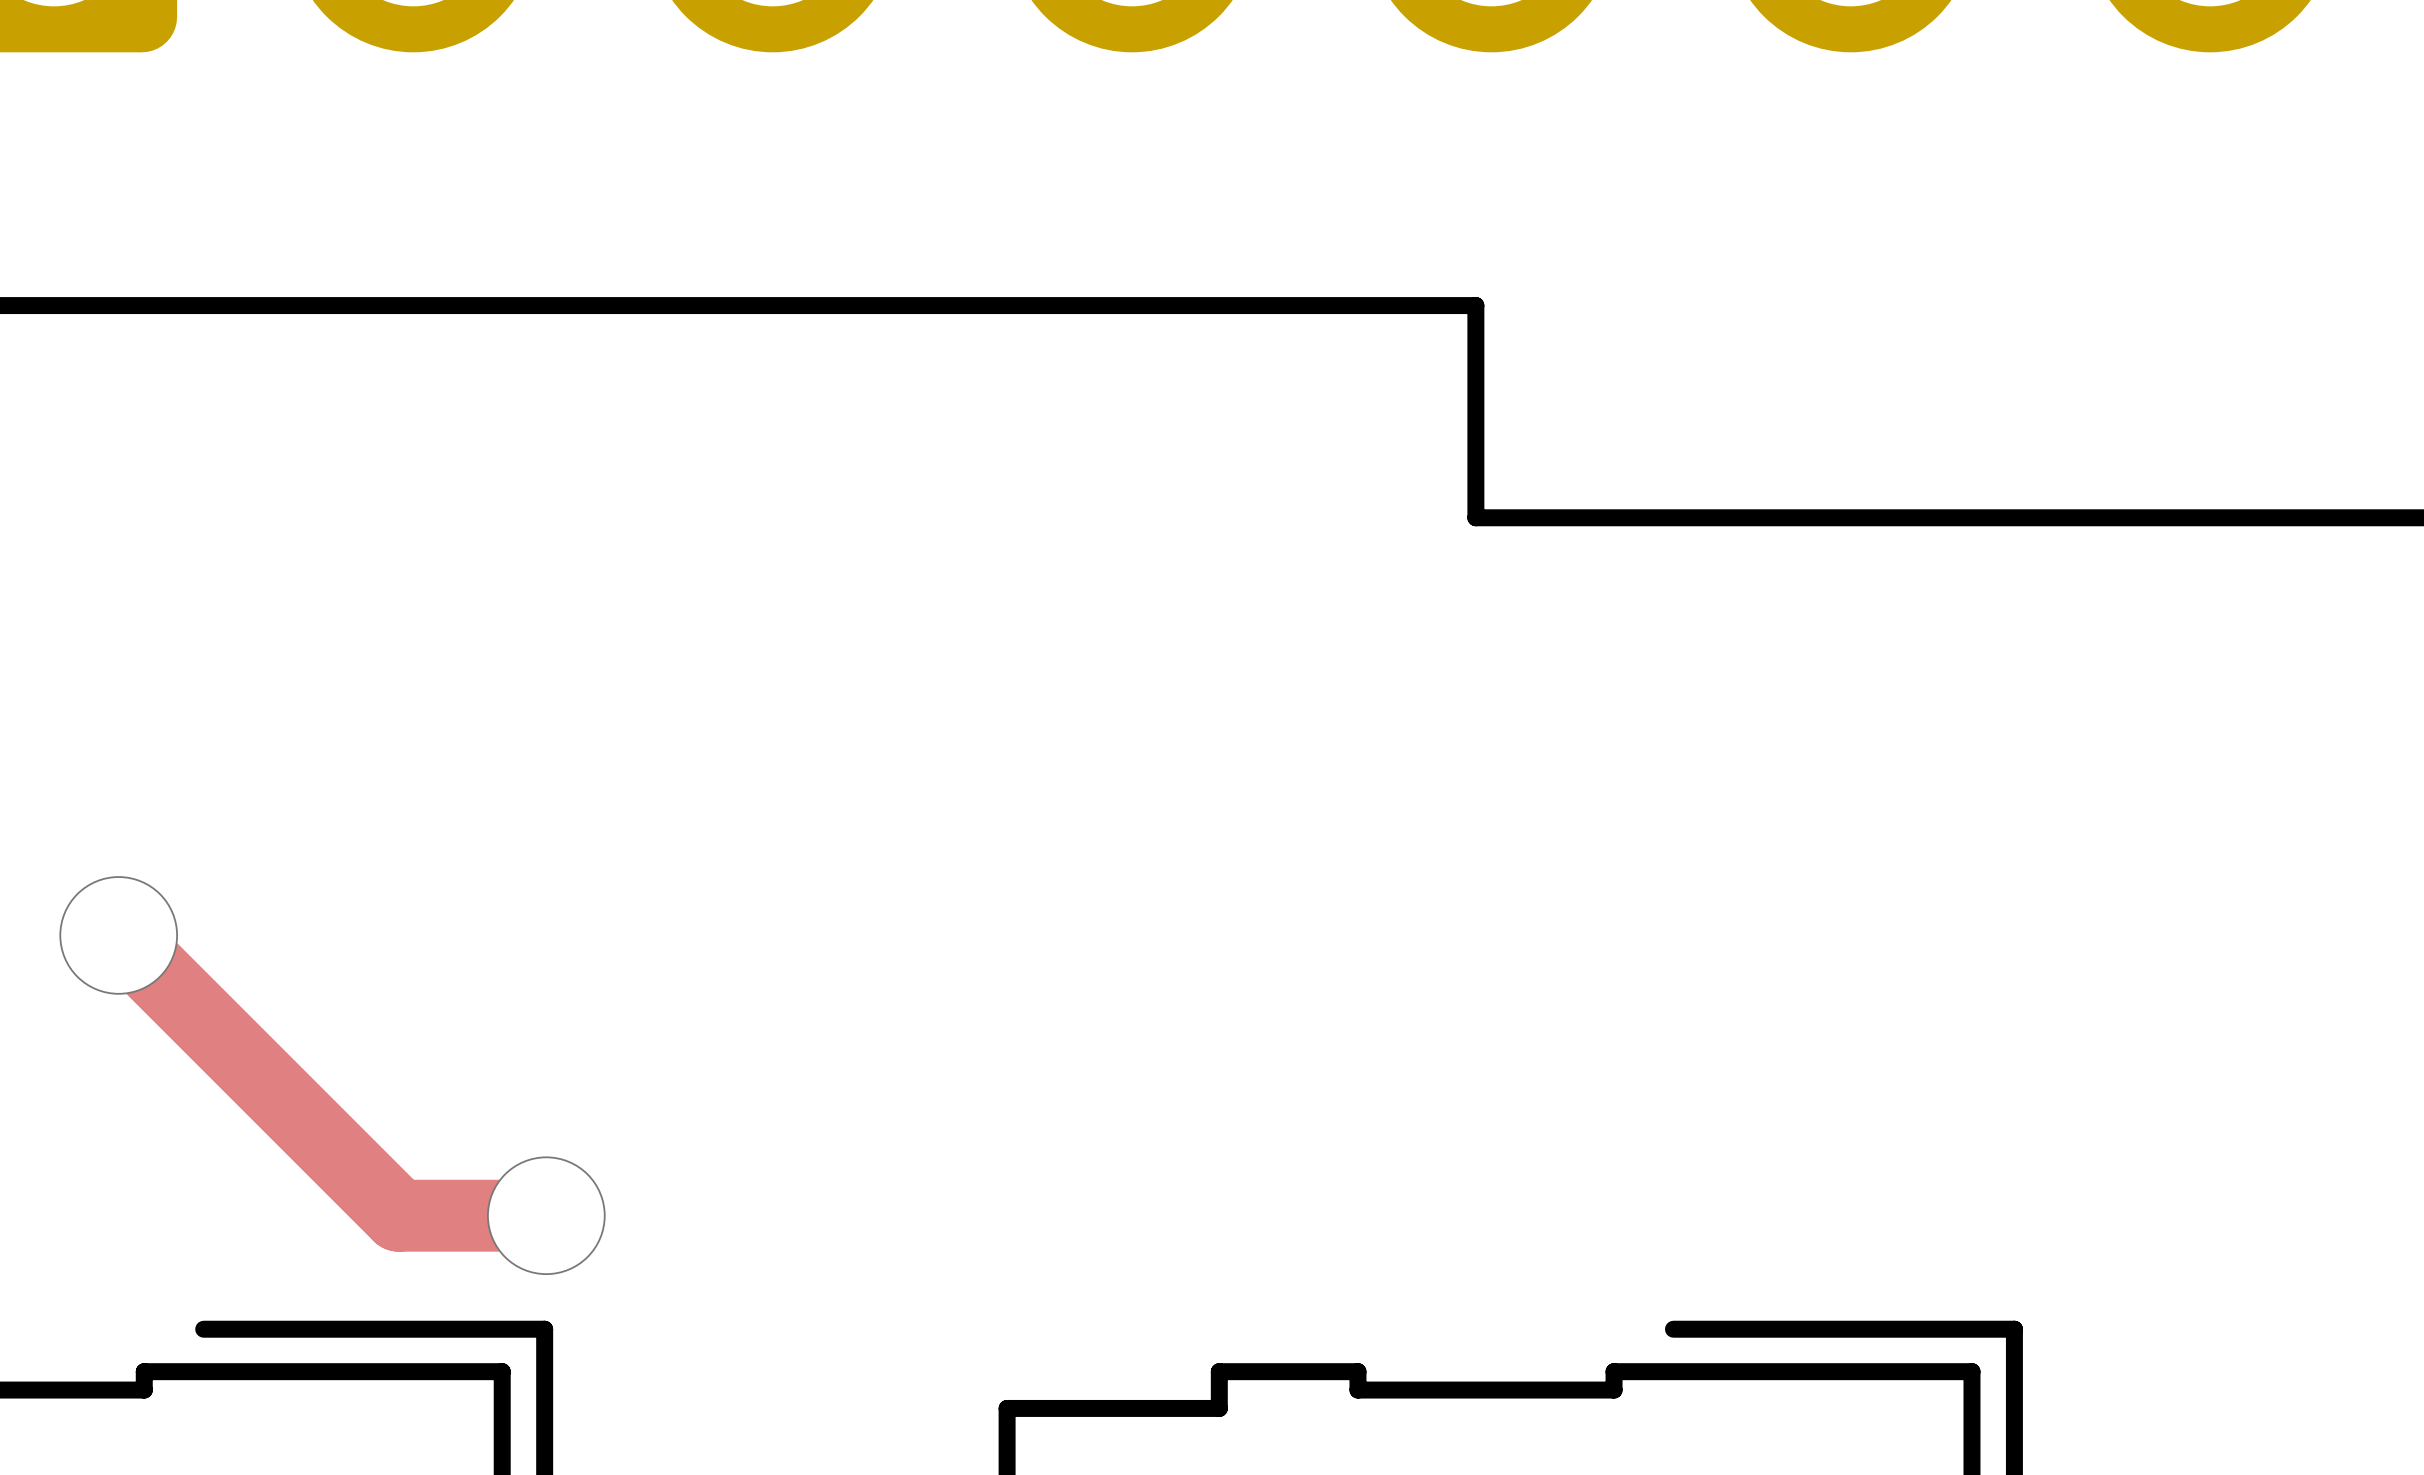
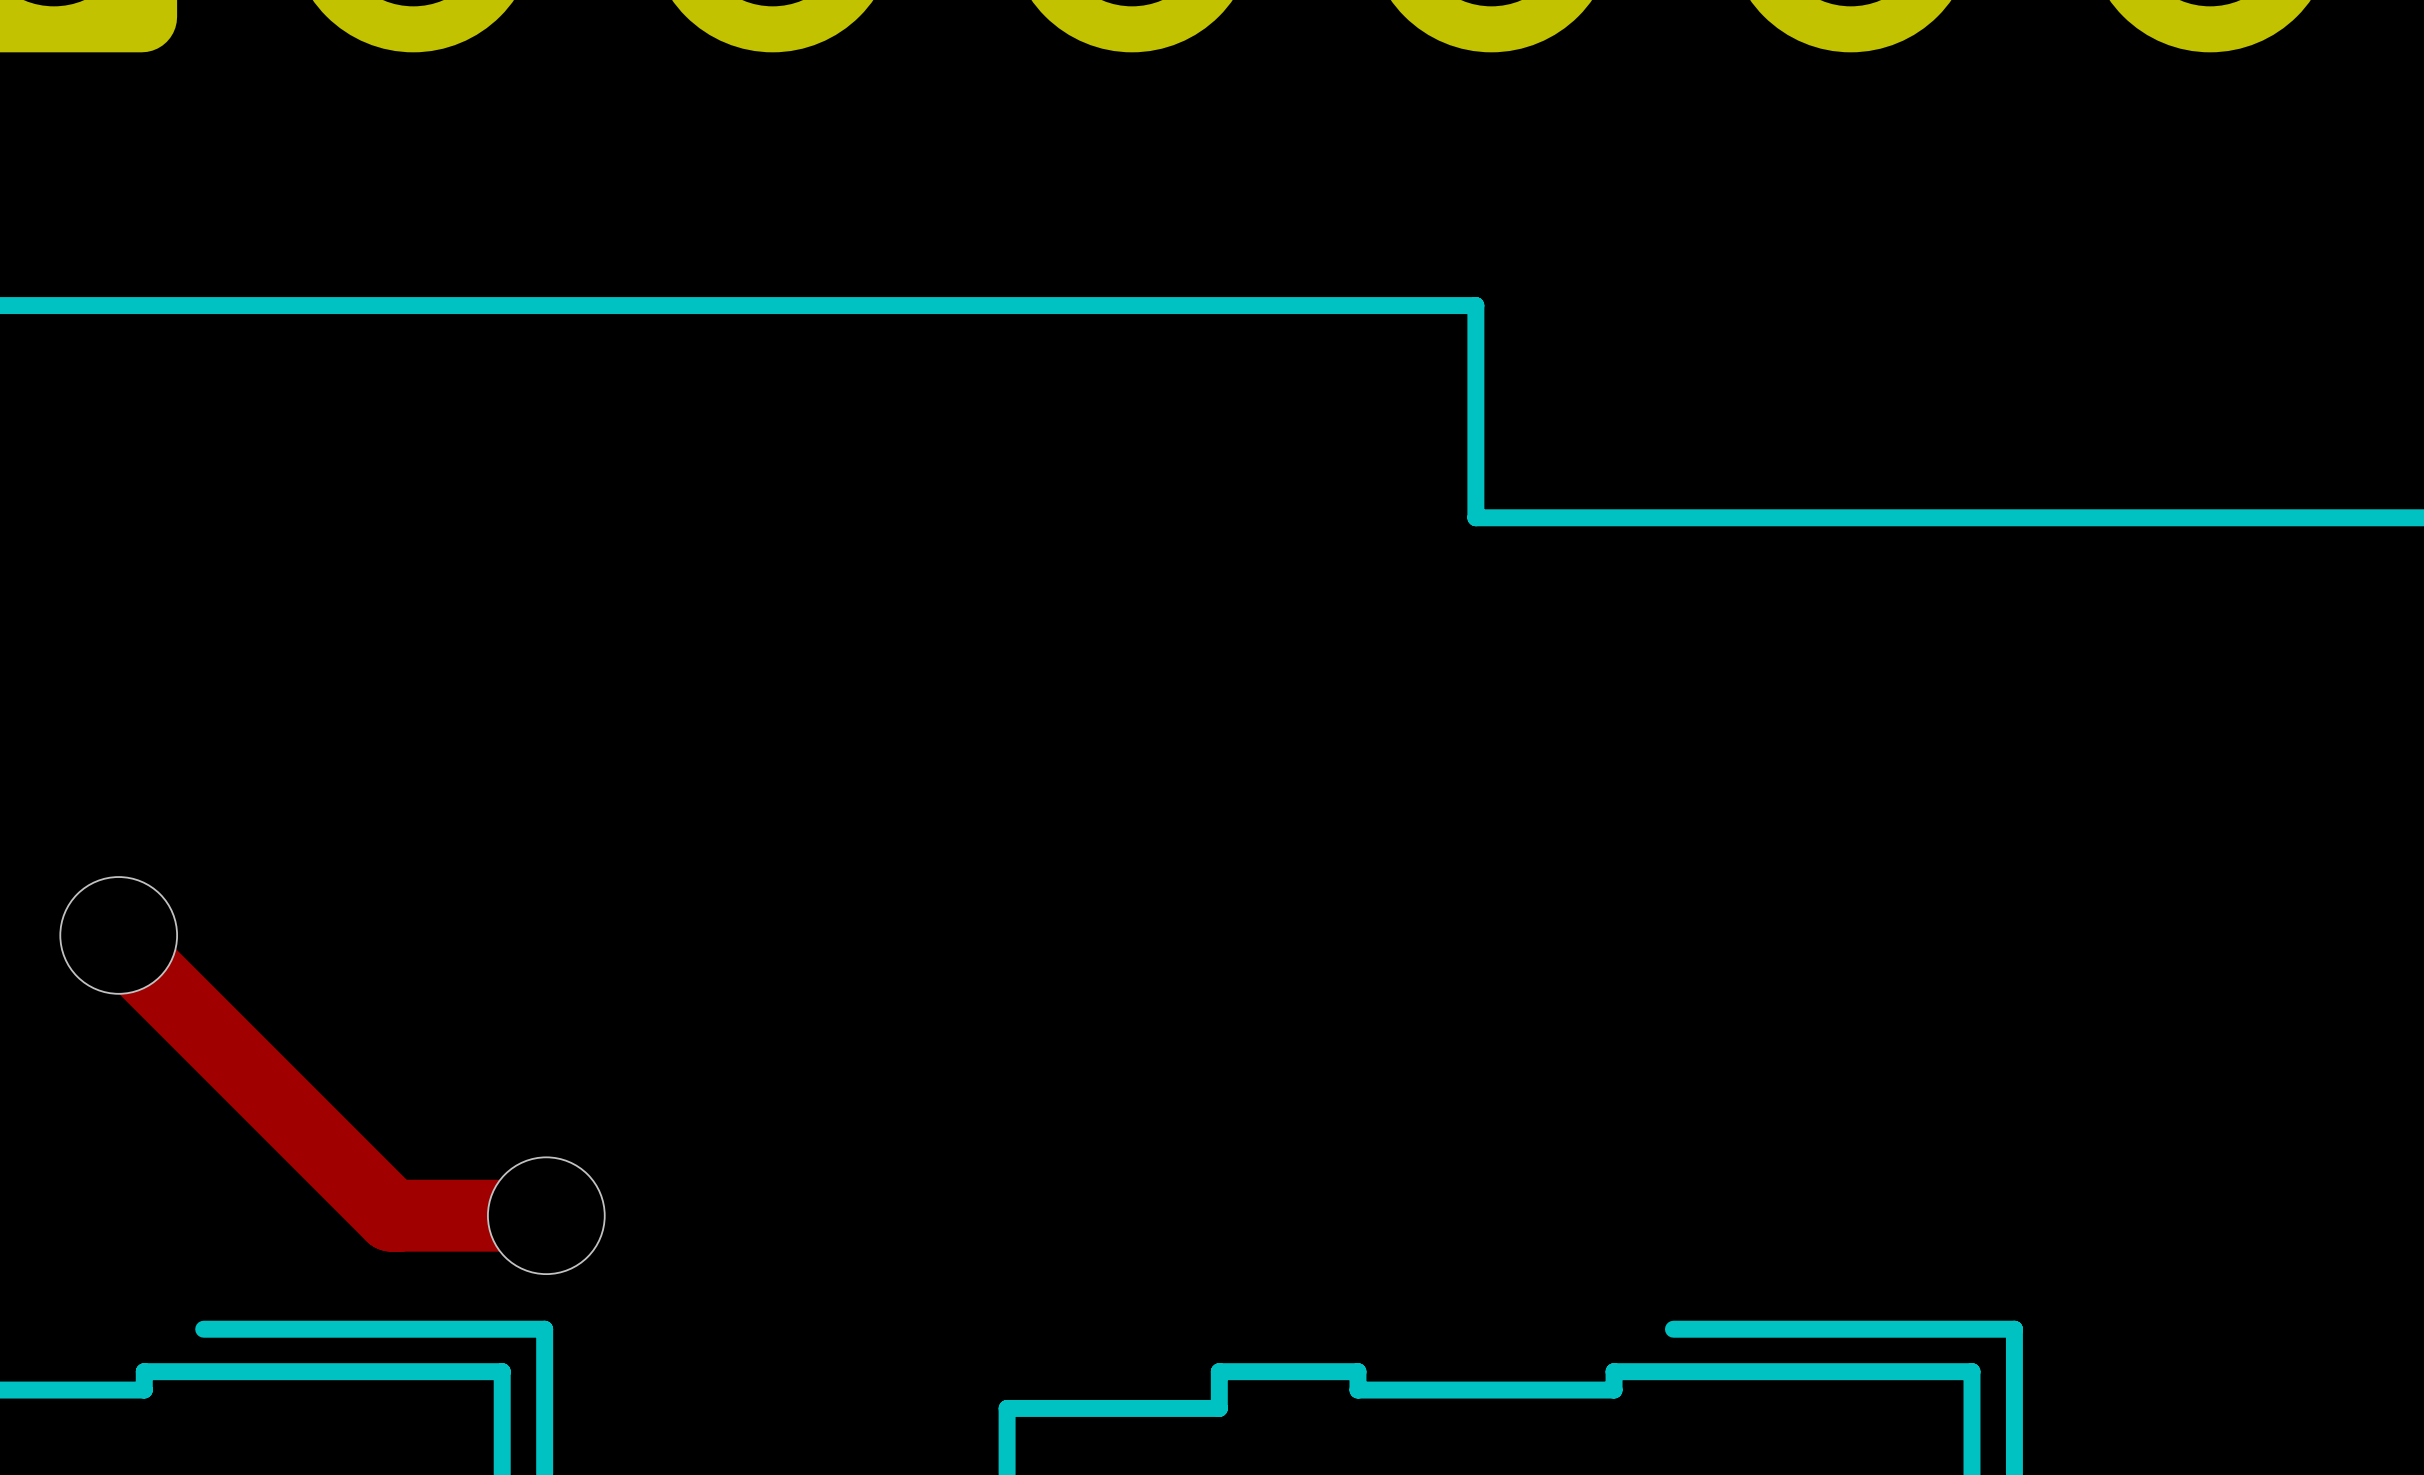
track: (118, 935) (399, 1215) -> (125, 949) (391, 1215) (399, 1215)

